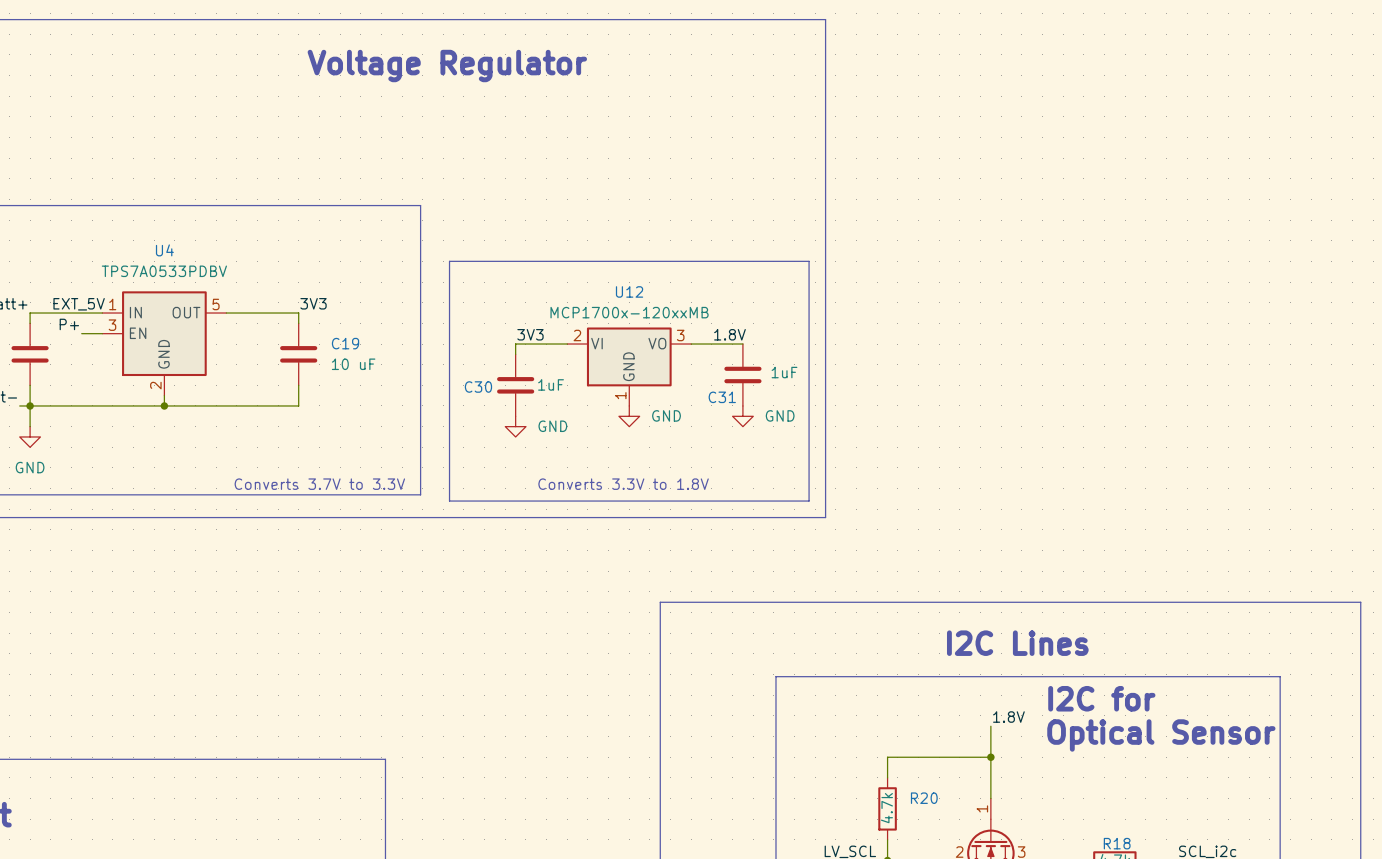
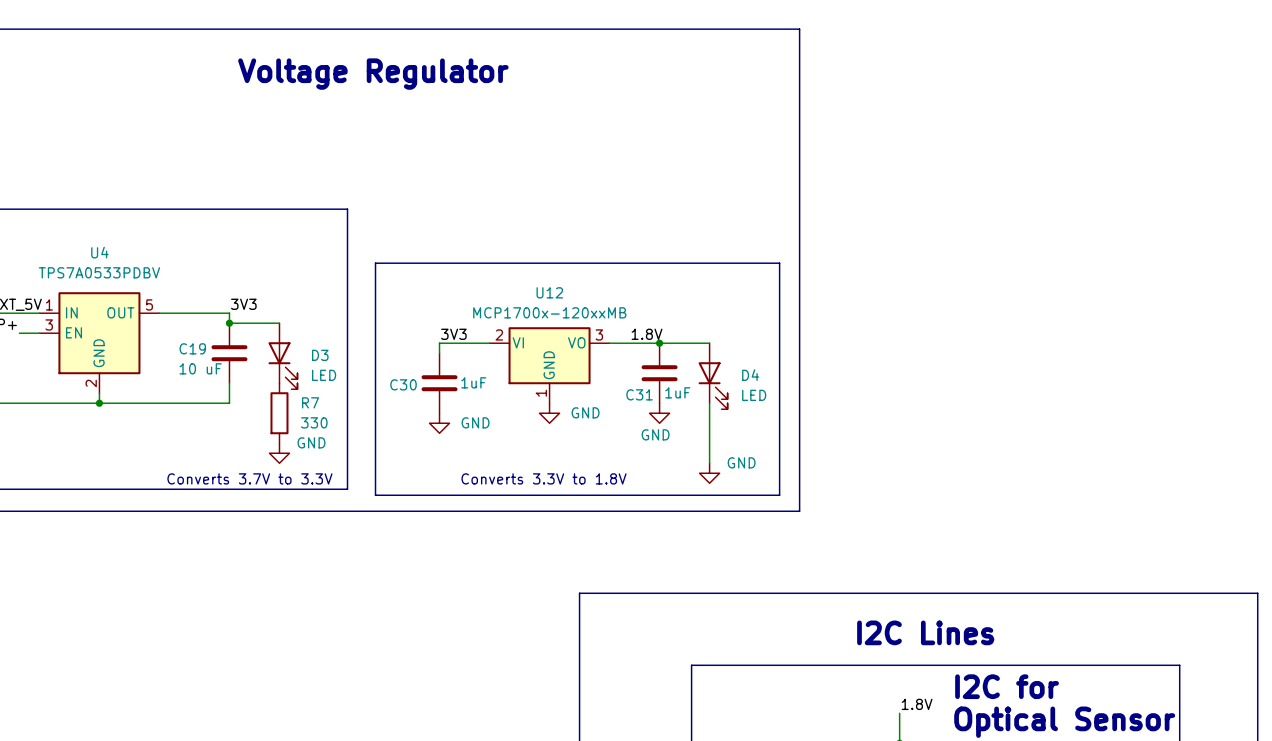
line: (825, 19) (825, 517) -> (739, 29) (799, 29) (799, 511) (739, 511)
line: (809, 261) (809, 501) -> (723, 263) (779, 263) (779, 495) (723, 495)
wire: none -> (229, 323) (279, 323)
junction: none -> (229, 323)
C19 name position: C19 (345, 343) -> C19 (192, 348)
wire: none -> (659, 343) (709, 343)
junction: none -> (659, 343)
D3: none -> LED (282, 356)
C19 value position: 10 uF (353, 364) -> 10 uF (200, 368)
C31 value position: 1uF (784, 372) -> 1uF (677, 392)
D4: none -> LED (713, 376)
wire: none -> (709, 403) (709, 463)
power symbol text position: GND (780, 415) -> GND (655, 434)
R7: none -> 330 (279, 413)
power symbol: none -> GND (279, 453)
power symbol: none -> GND (709, 473)

